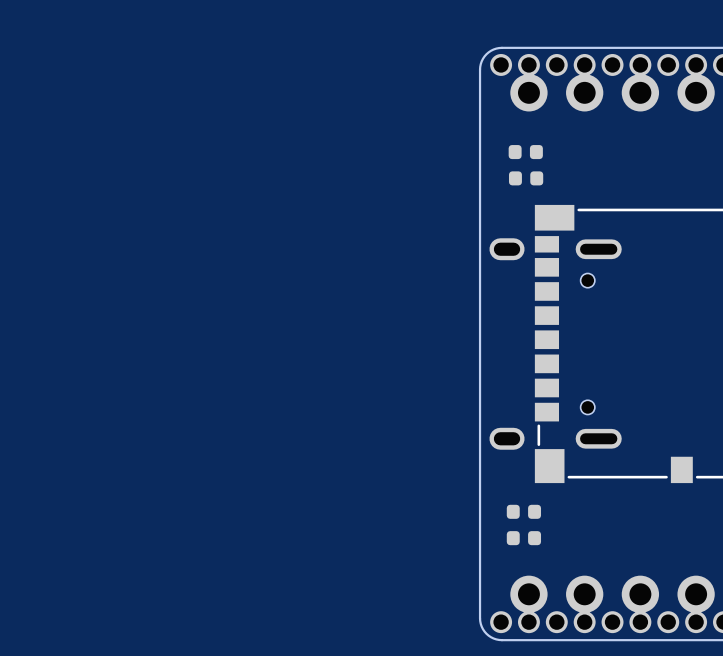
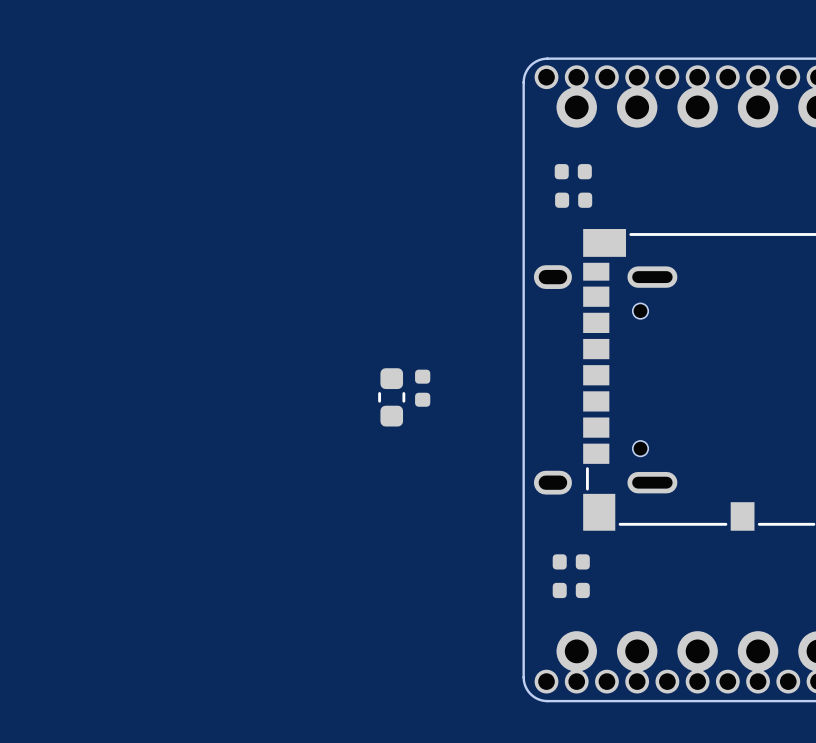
part: none -> (422, 388)
part: none -> (391, 397)

